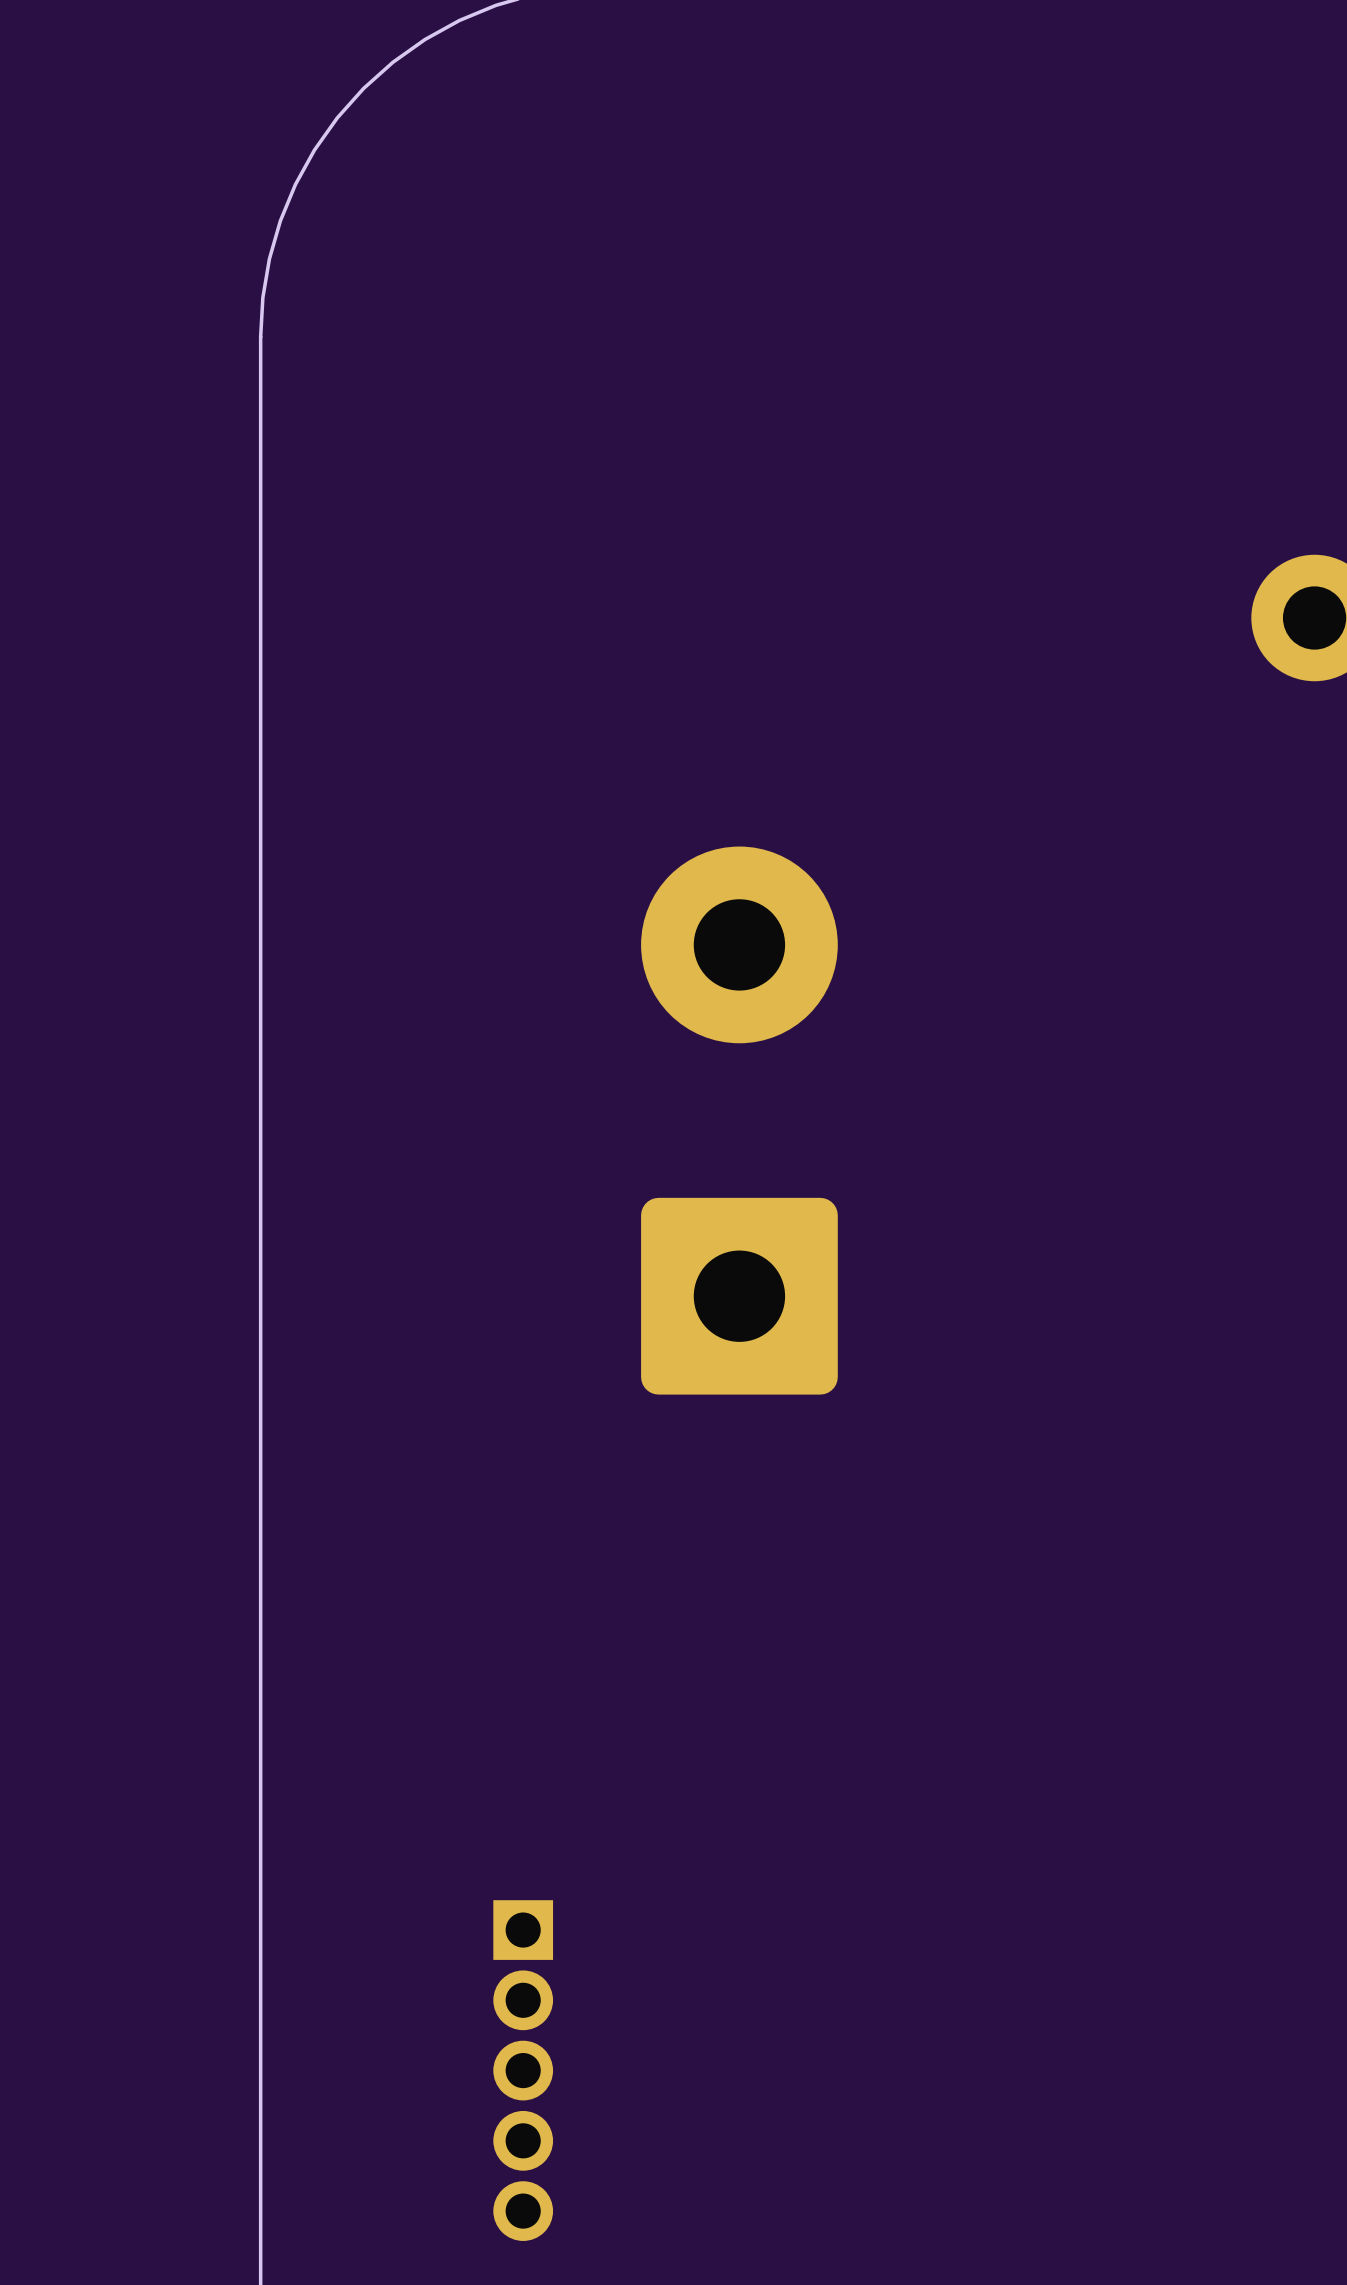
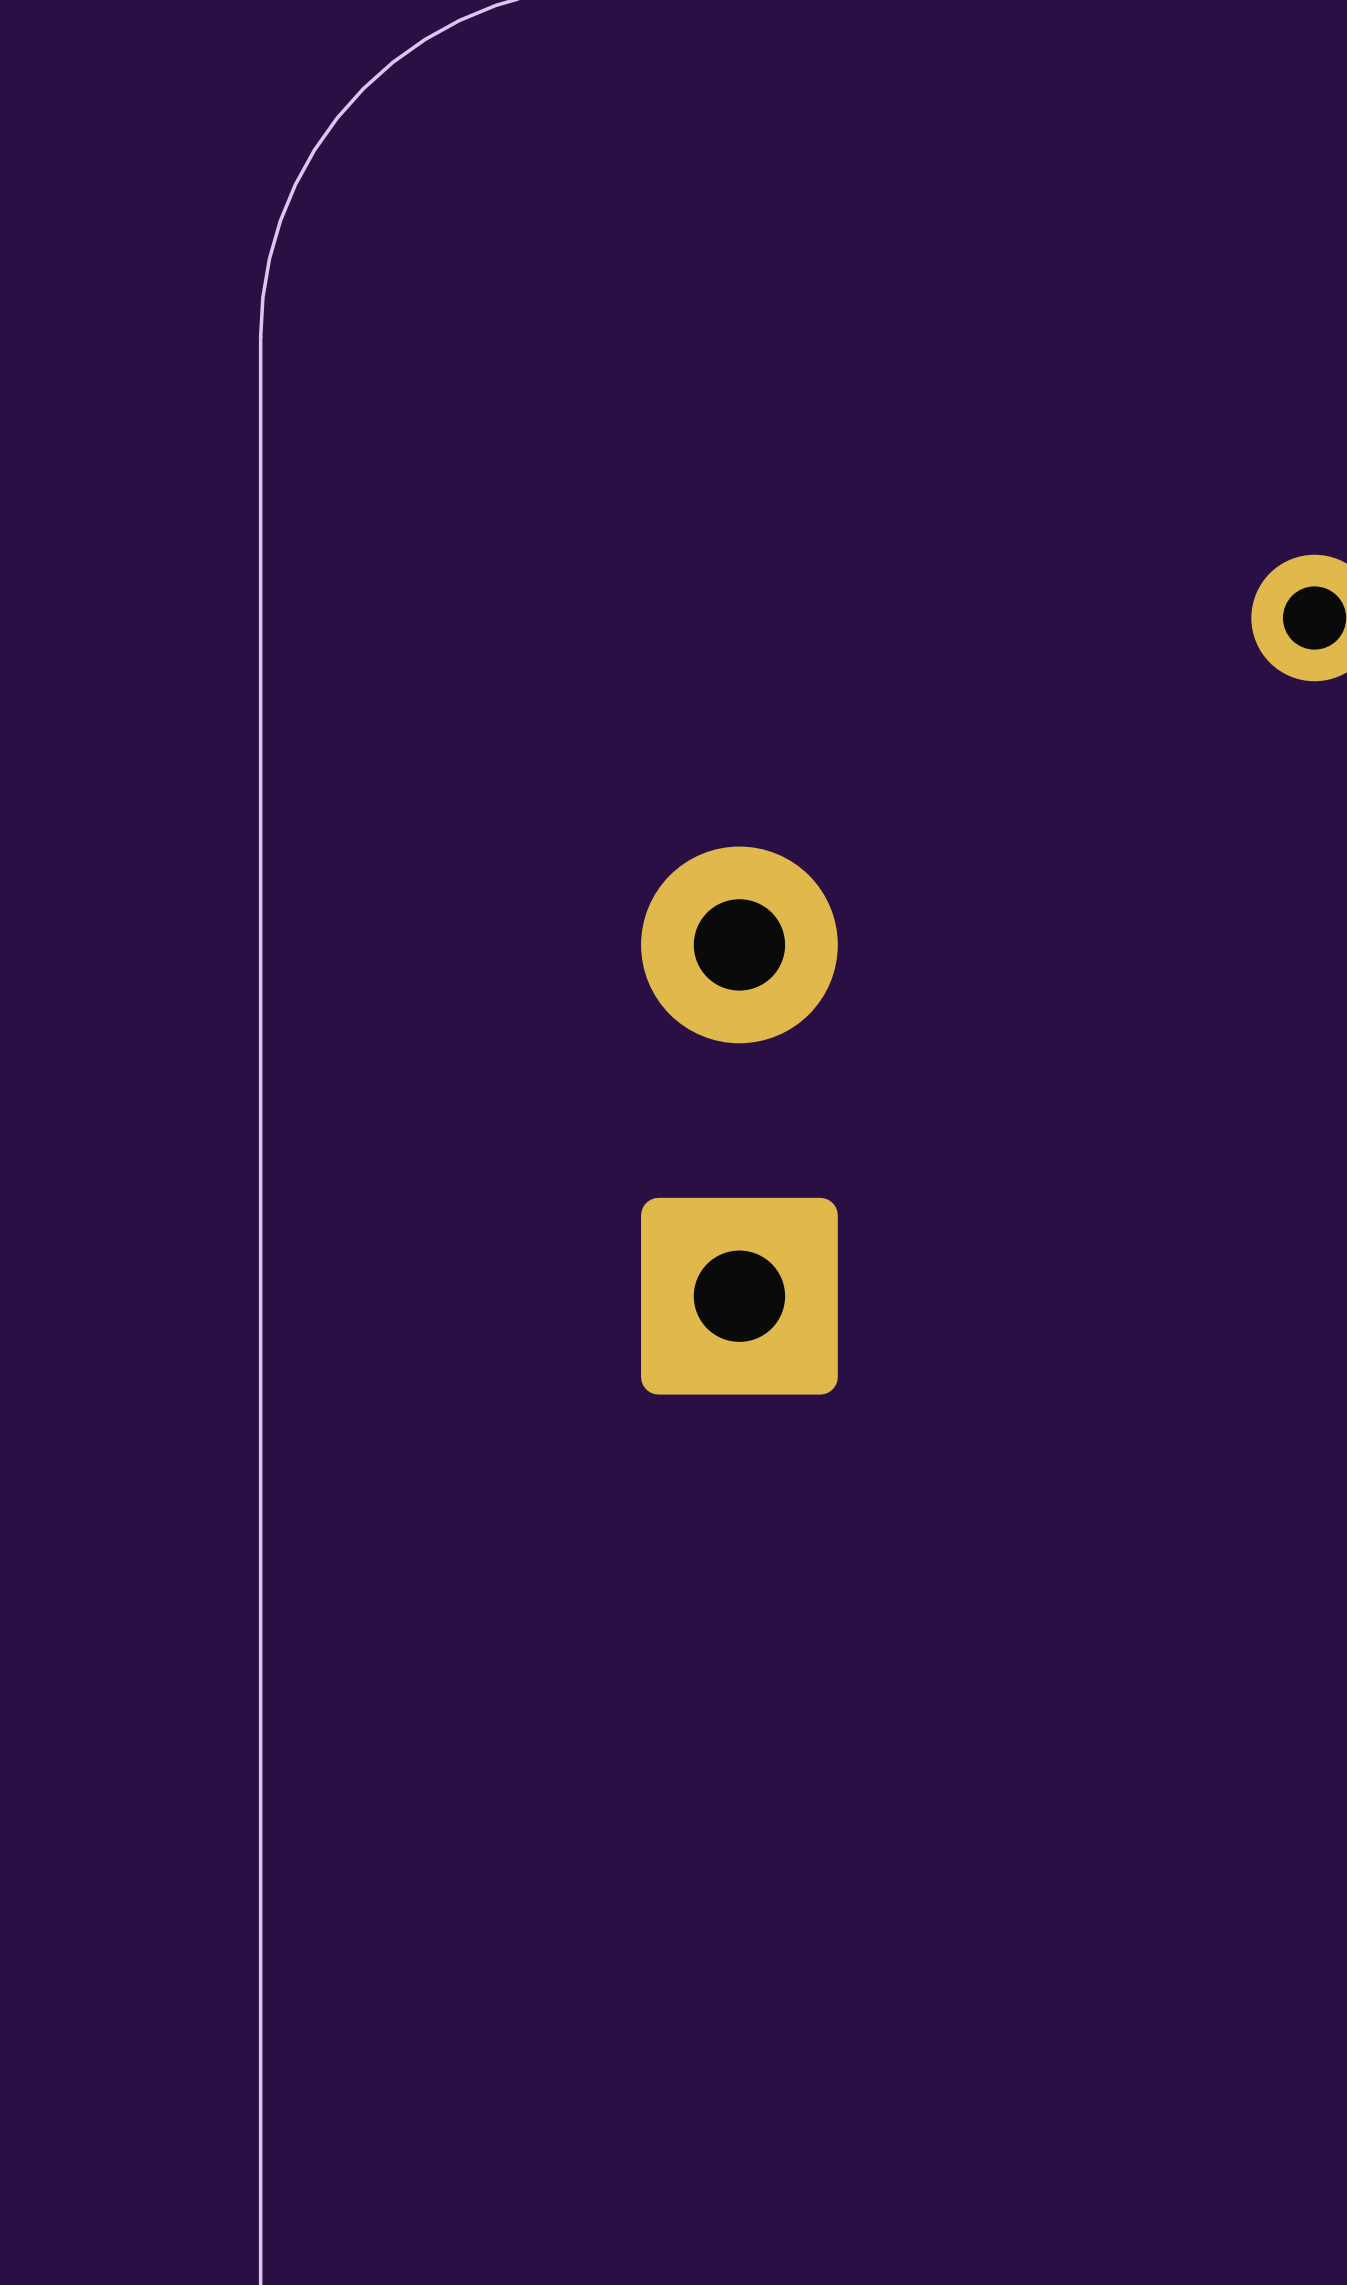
part: (523, 2070) -> none

